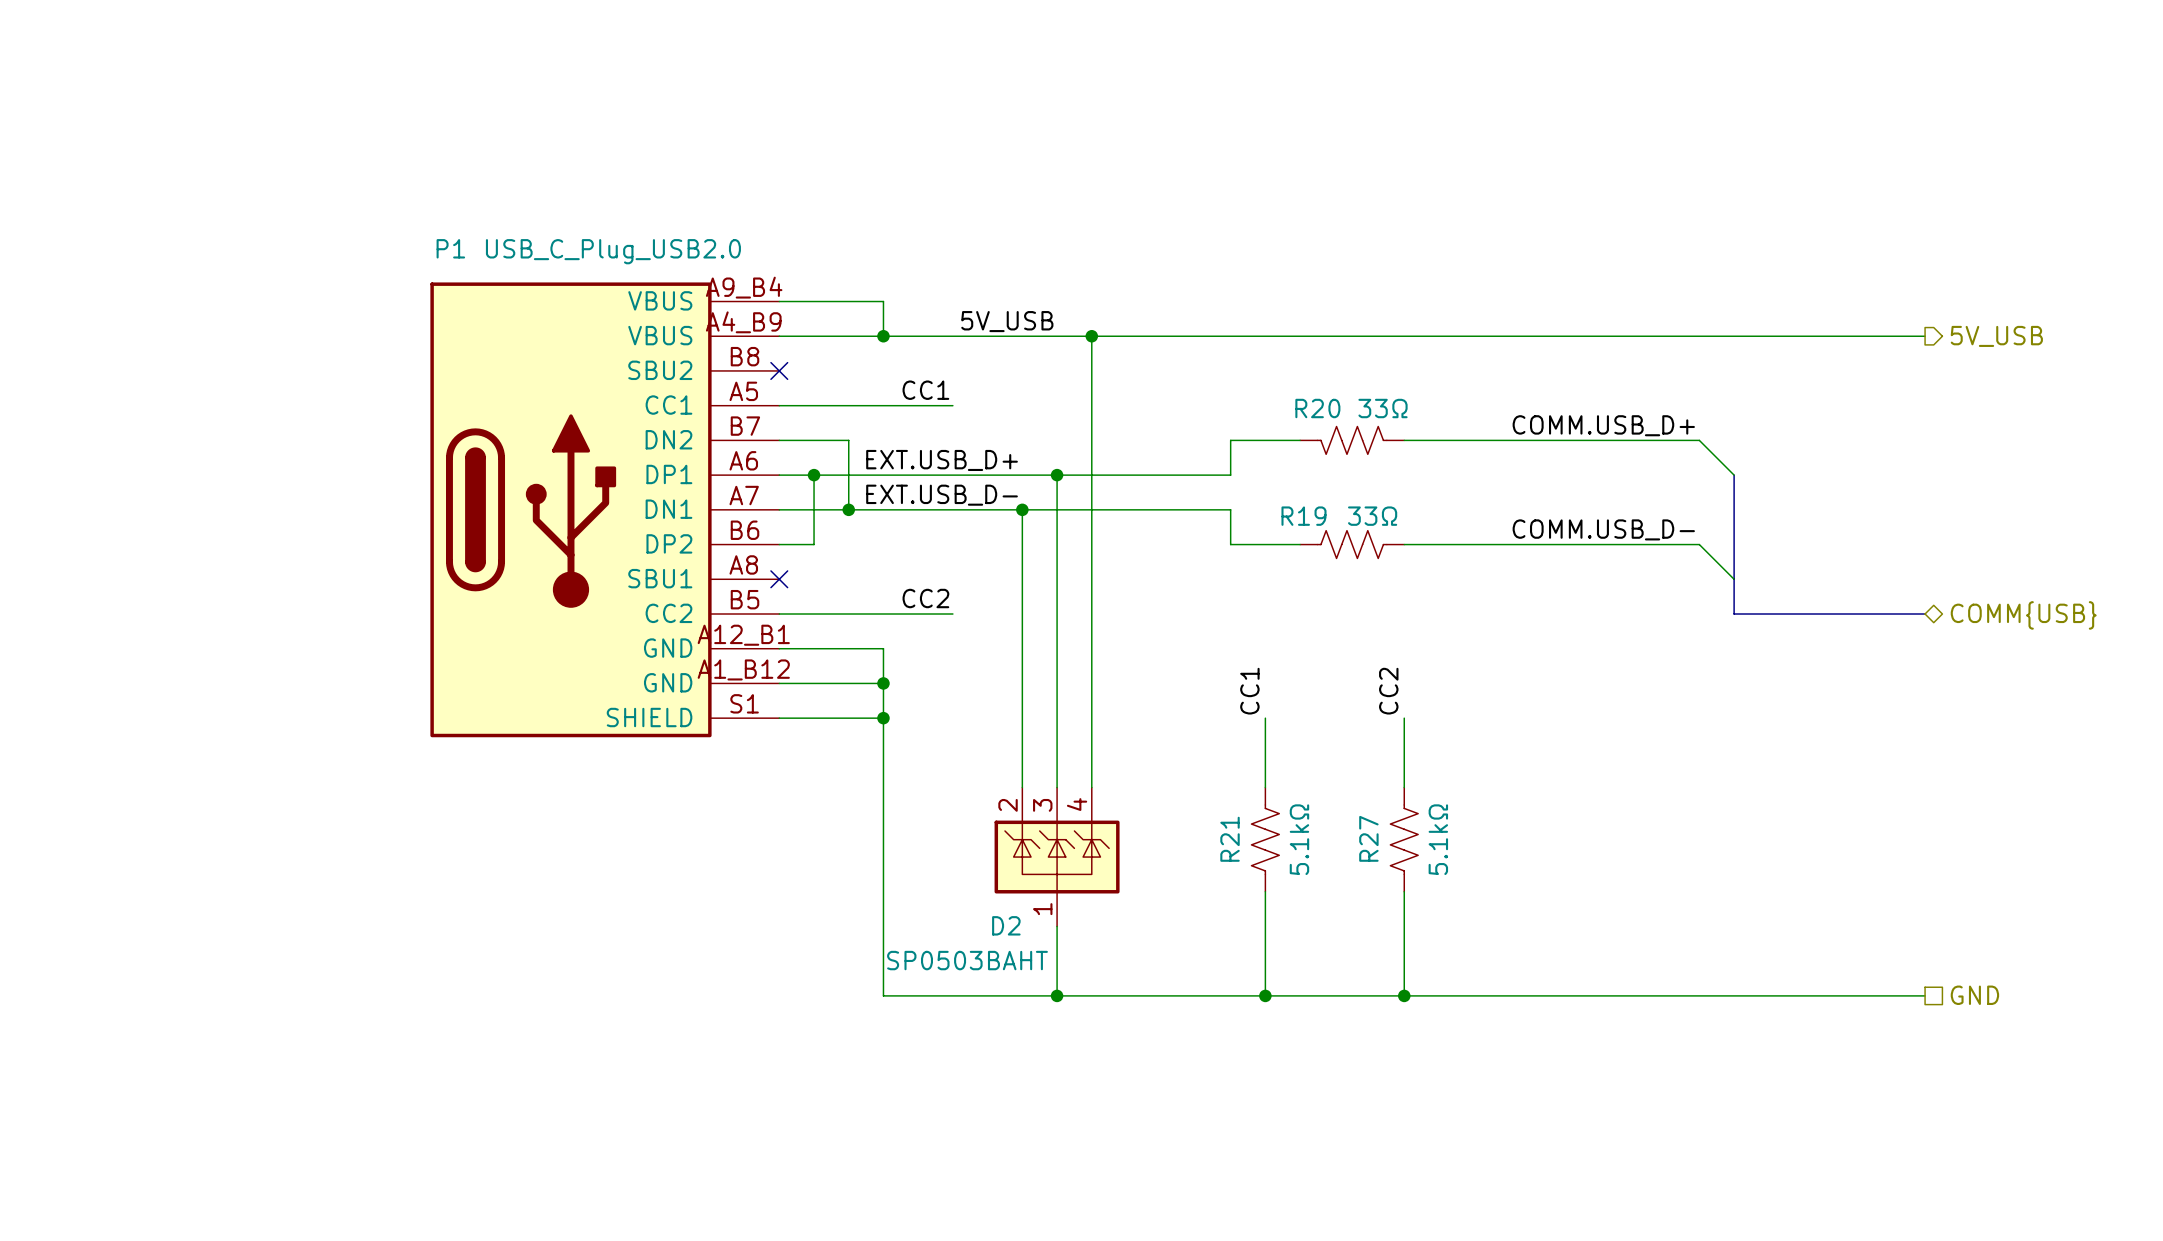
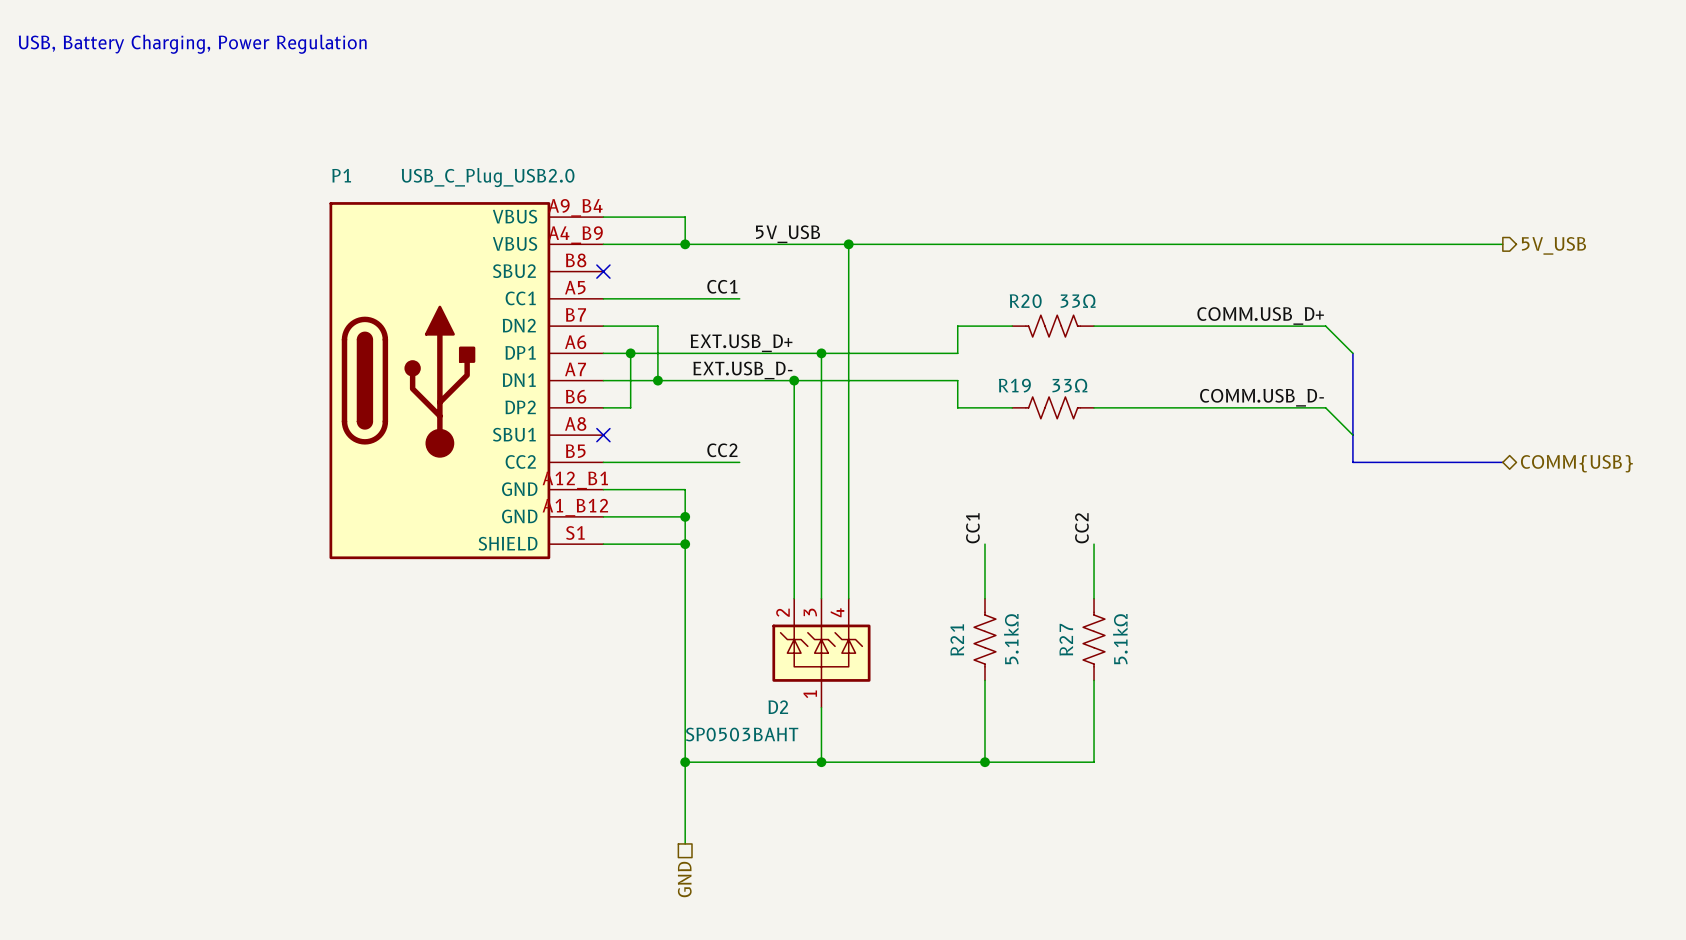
text: none -> USB, Battery Charging, Power Regulation (192, 44)
wire: none -> (685, 762) (685, 843)
junction: none -> (685, 762)
wire: (1404, 995) (1925, 995) -> none
junction: (1404, 995) -> none
hierarchical label: GND (1974, 995) -> none
hierarchical label: none -> GND (684, 879)

